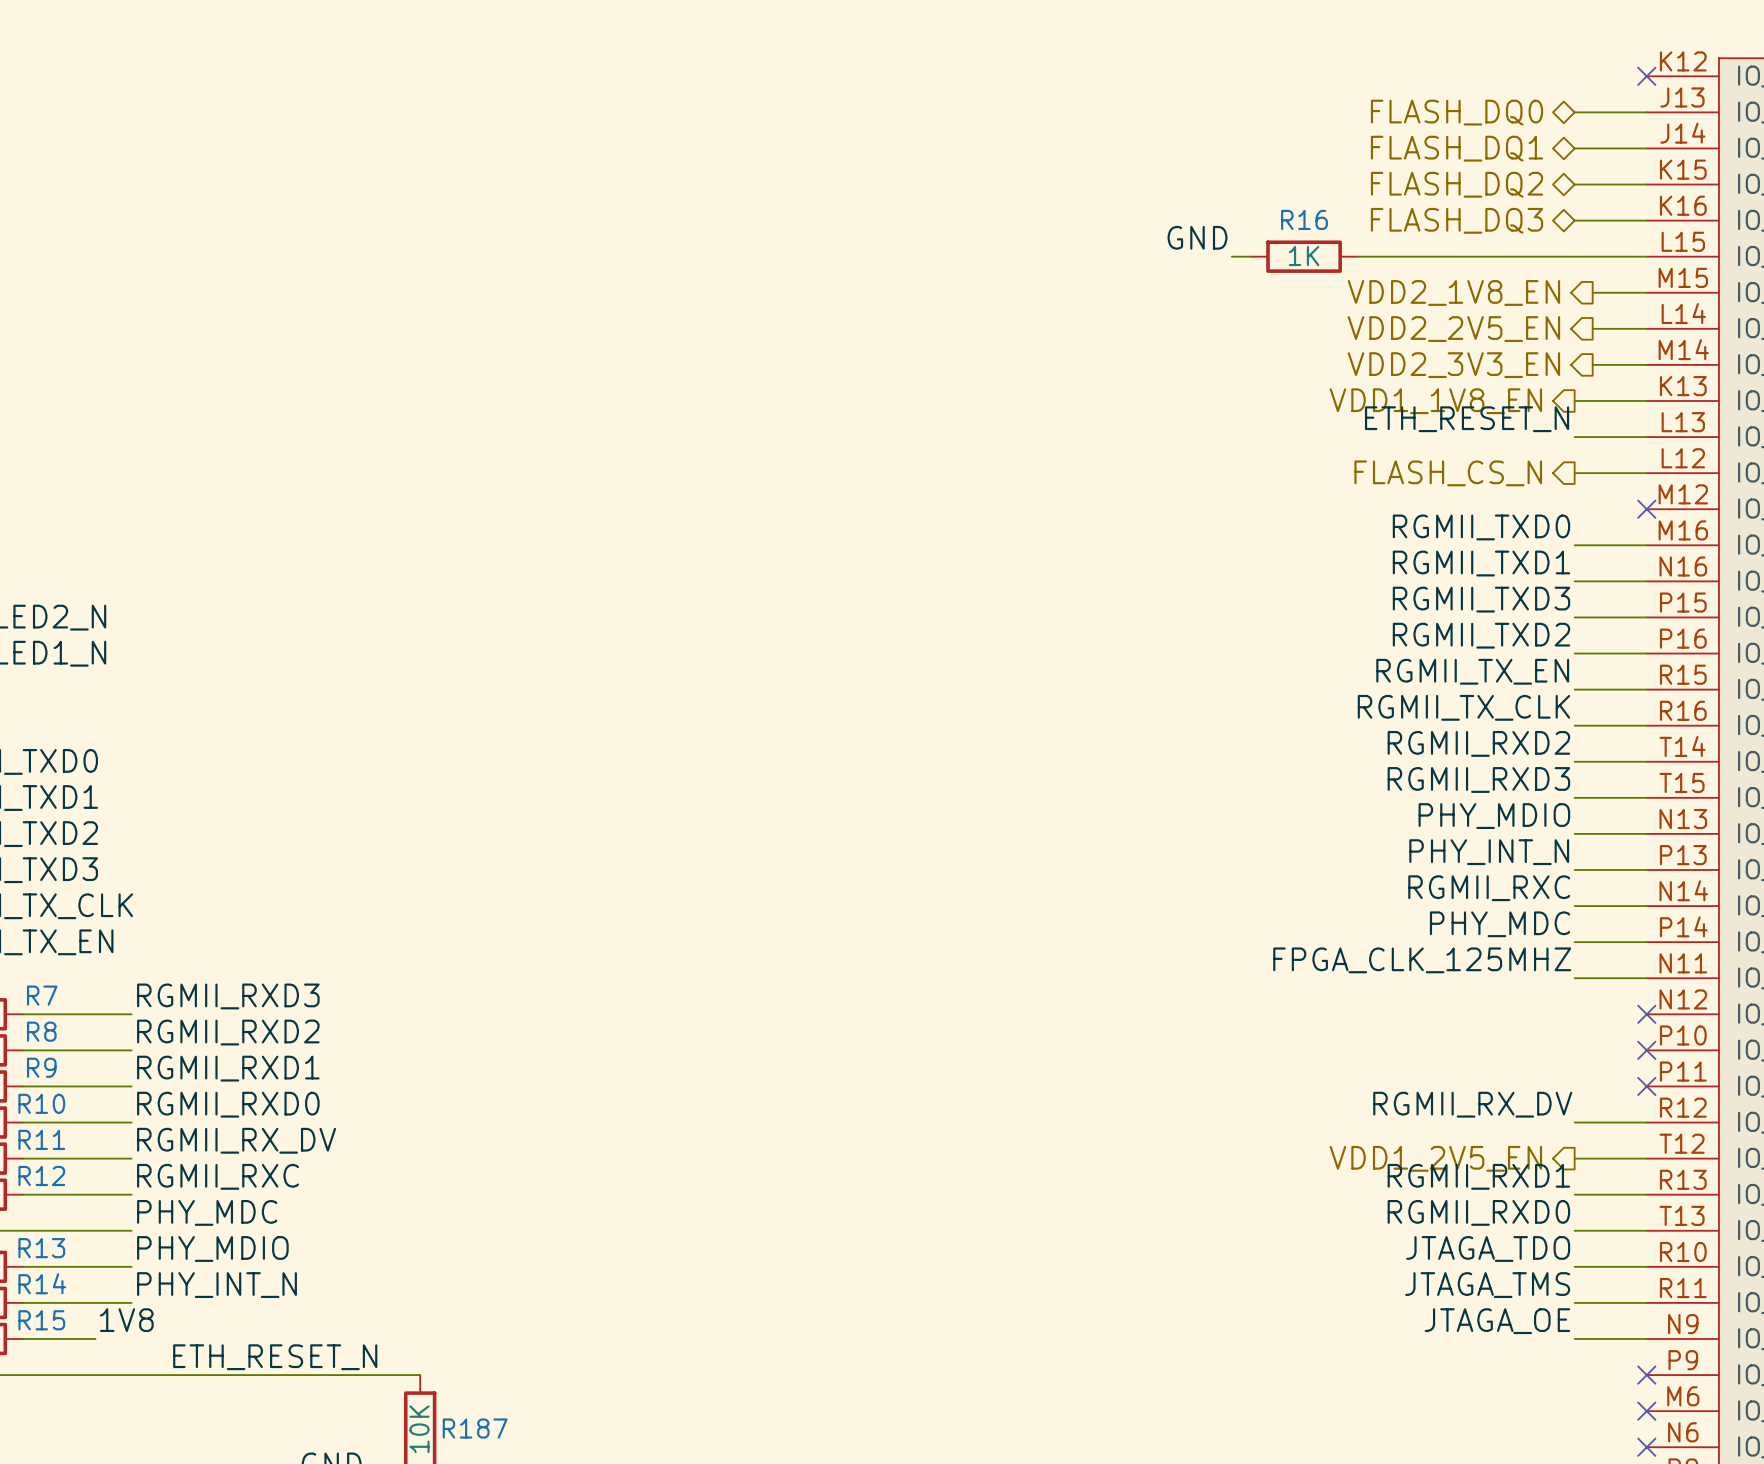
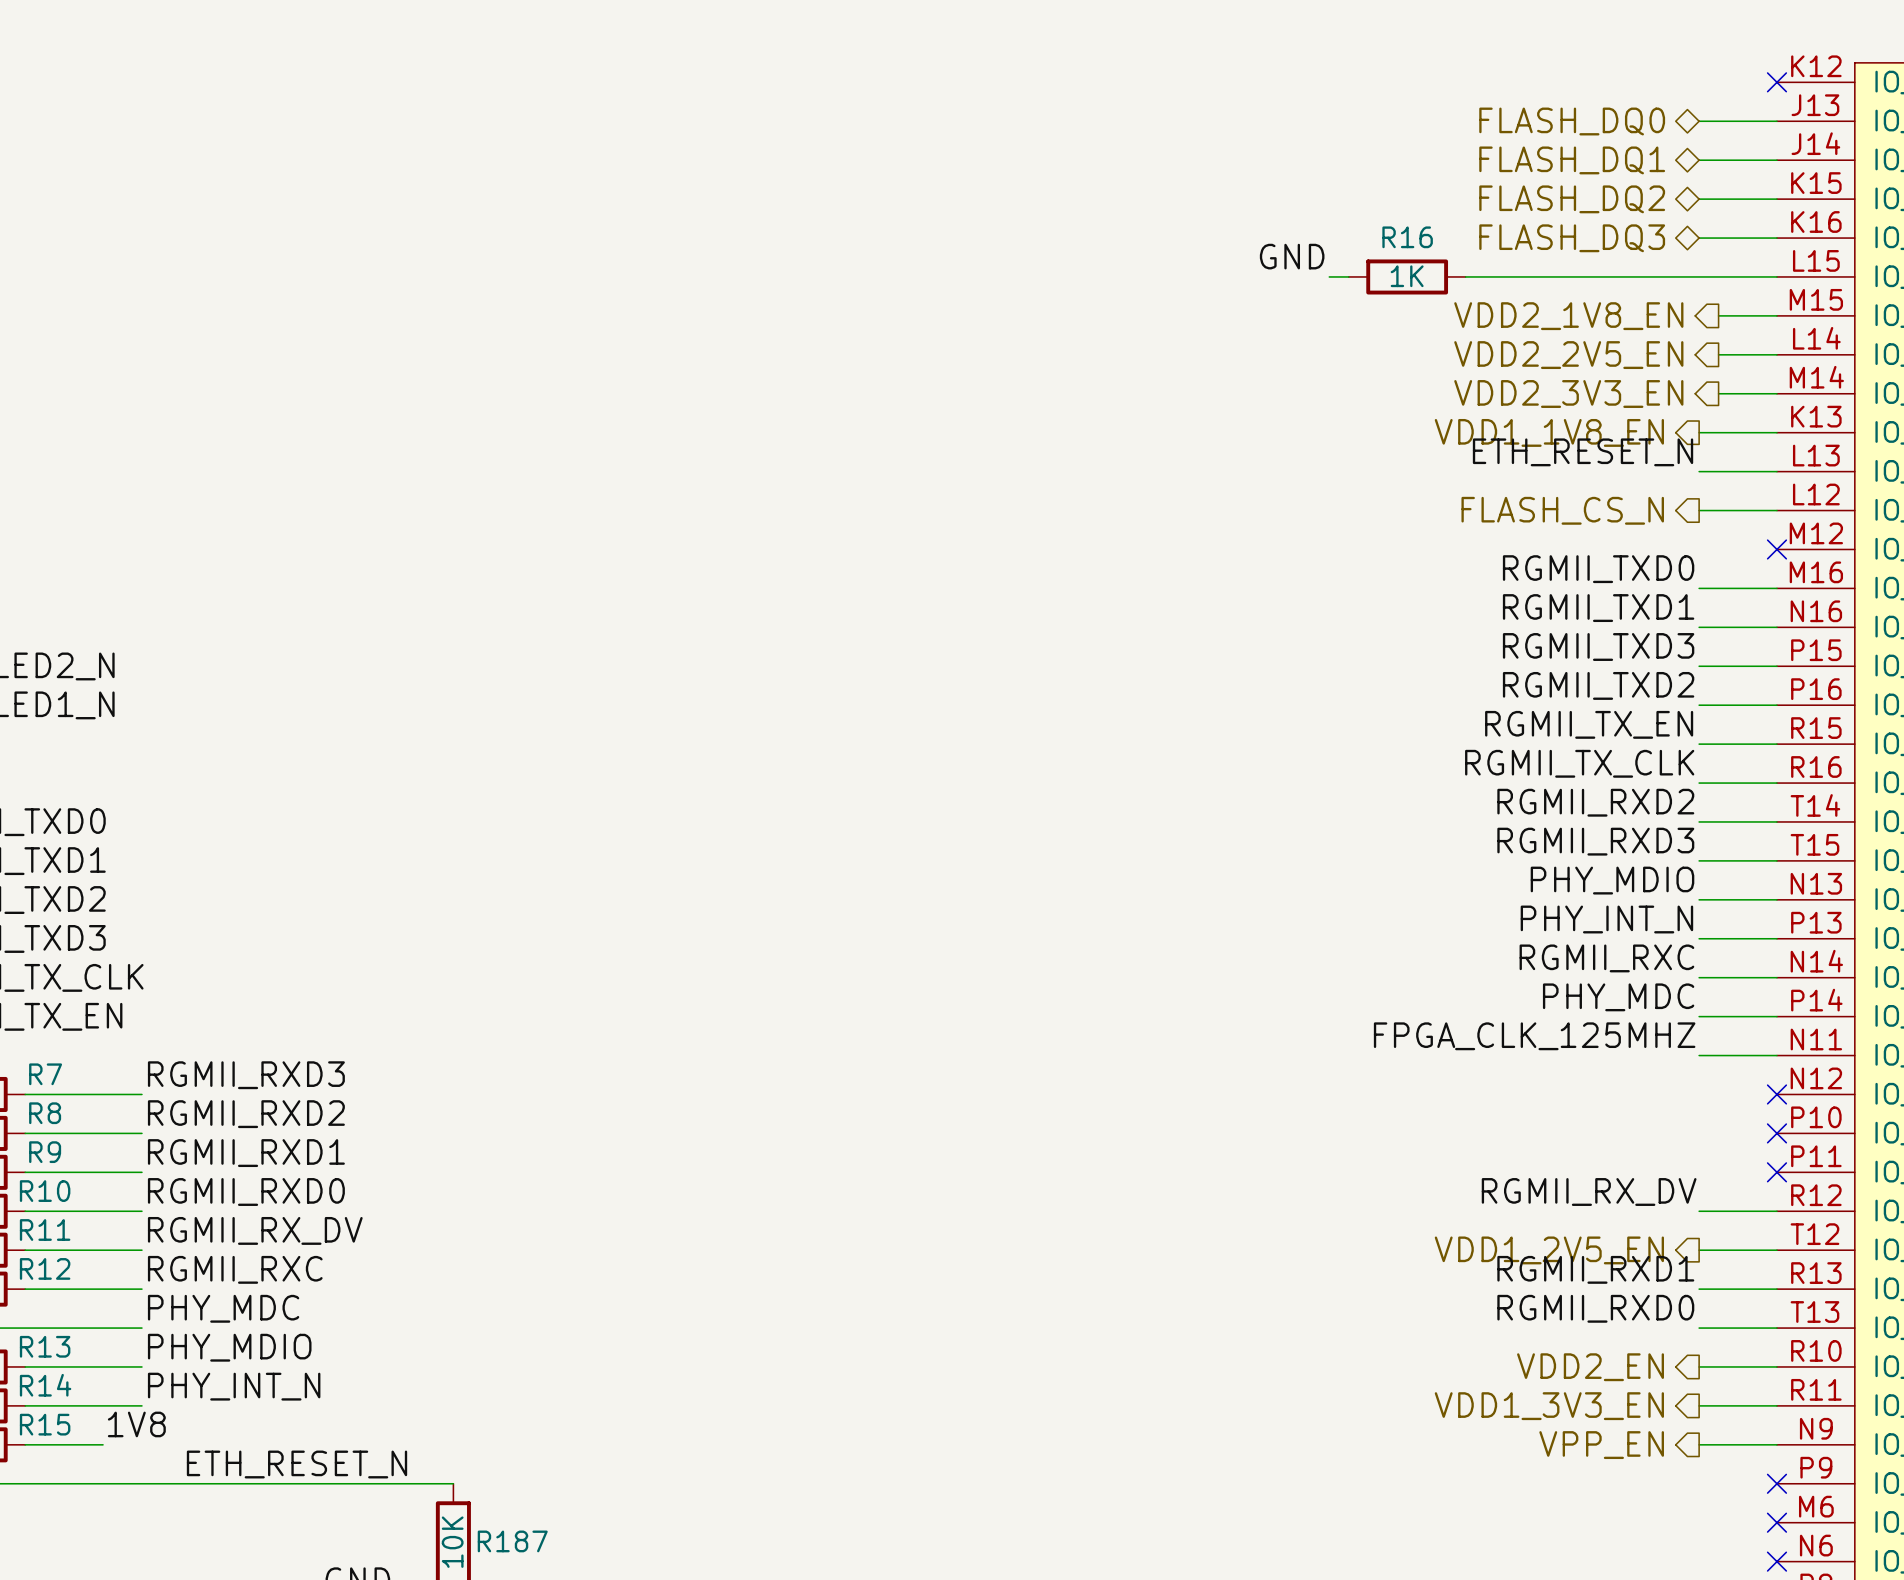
label: JTAGA_TDO (1488, 1248) -> none
hierarchical label: none -> VDD2_EN (1590, 1367)
label: JTAGA_TMS (1487, 1285) -> none
hierarchical label: none -> VDD1_3V3_EN (1549, 1406)
label: JTAGA_OE (1497, 1321) -> none
hierarchical label: none -> VPP_EN (1601, 1445)

